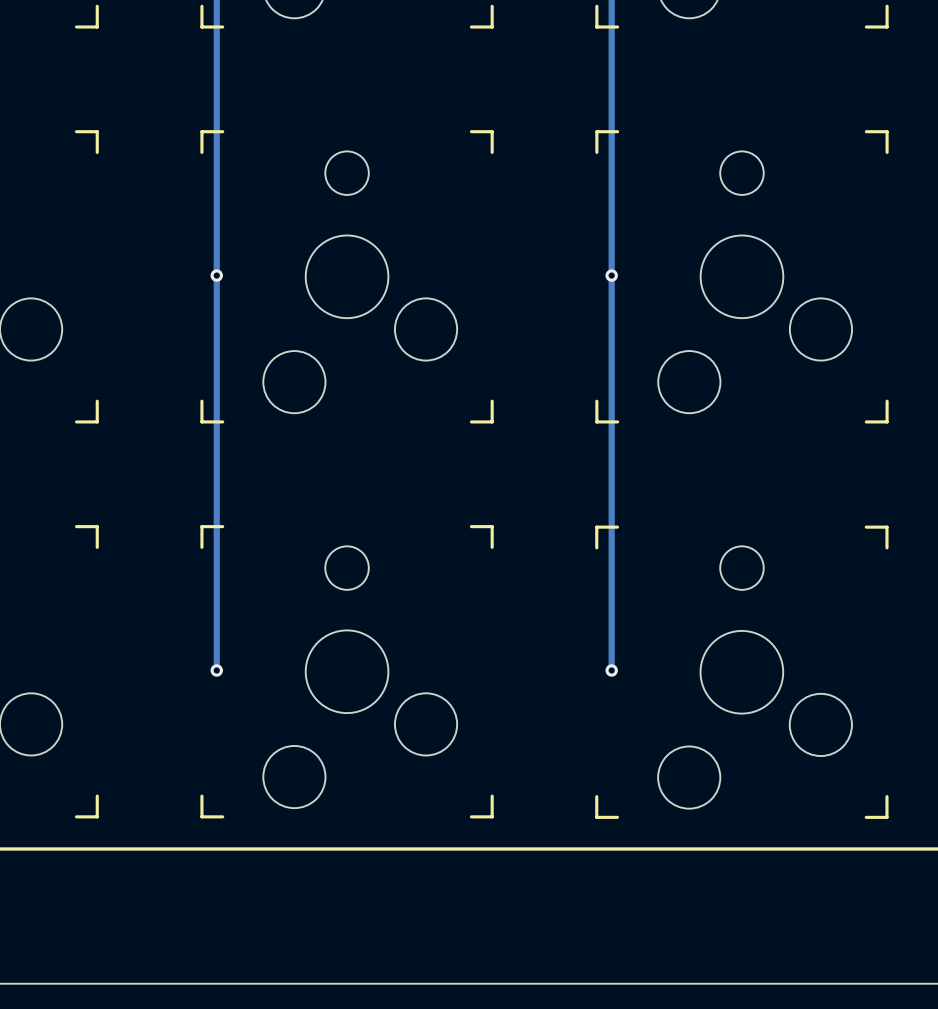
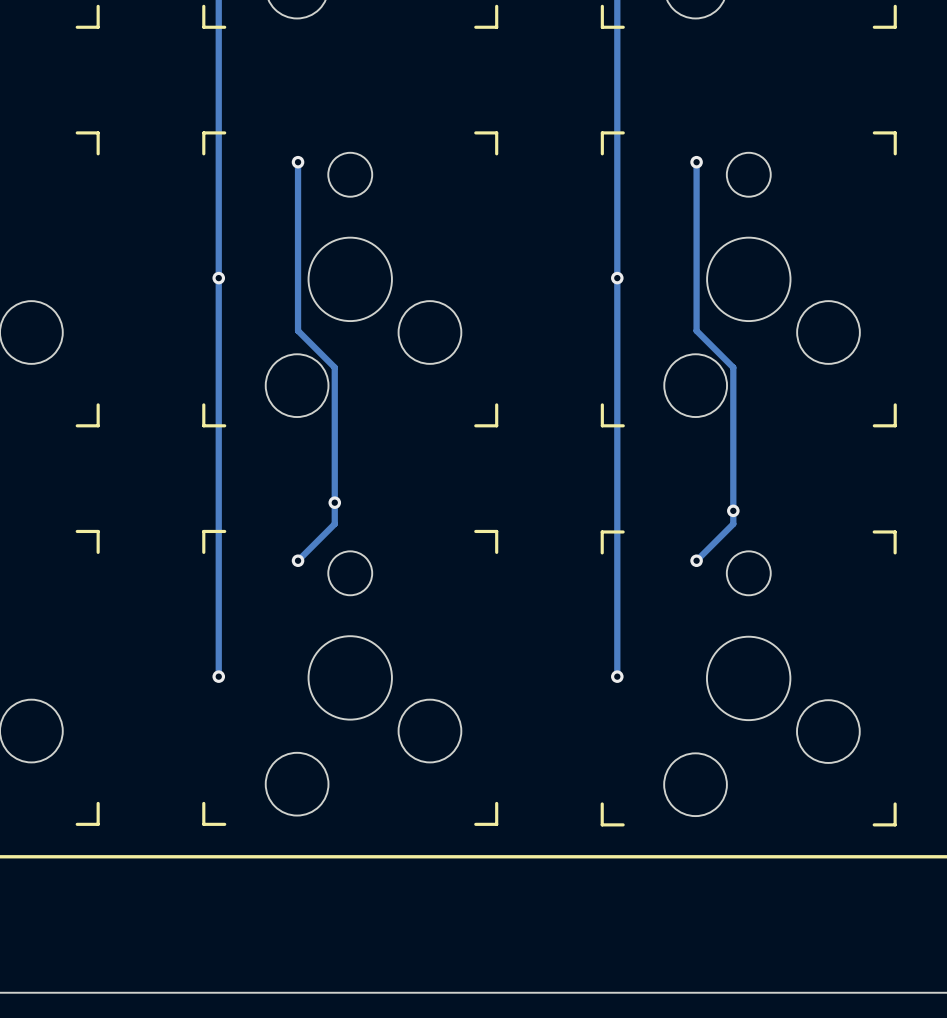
track: none -> (298, 162) (298, 330) (334, 367) (334, 524) (298, 560)
via: none -> (298, 162)
track: none -> (696, 162) (696, 330) (733, 367) (733, 524) (696, 560)
via: none -> (696, 162)
via: none -> (334, 502)
via: none -> (733, 510)
via: none -> (298, 560)
via: none -> (696, 560)

